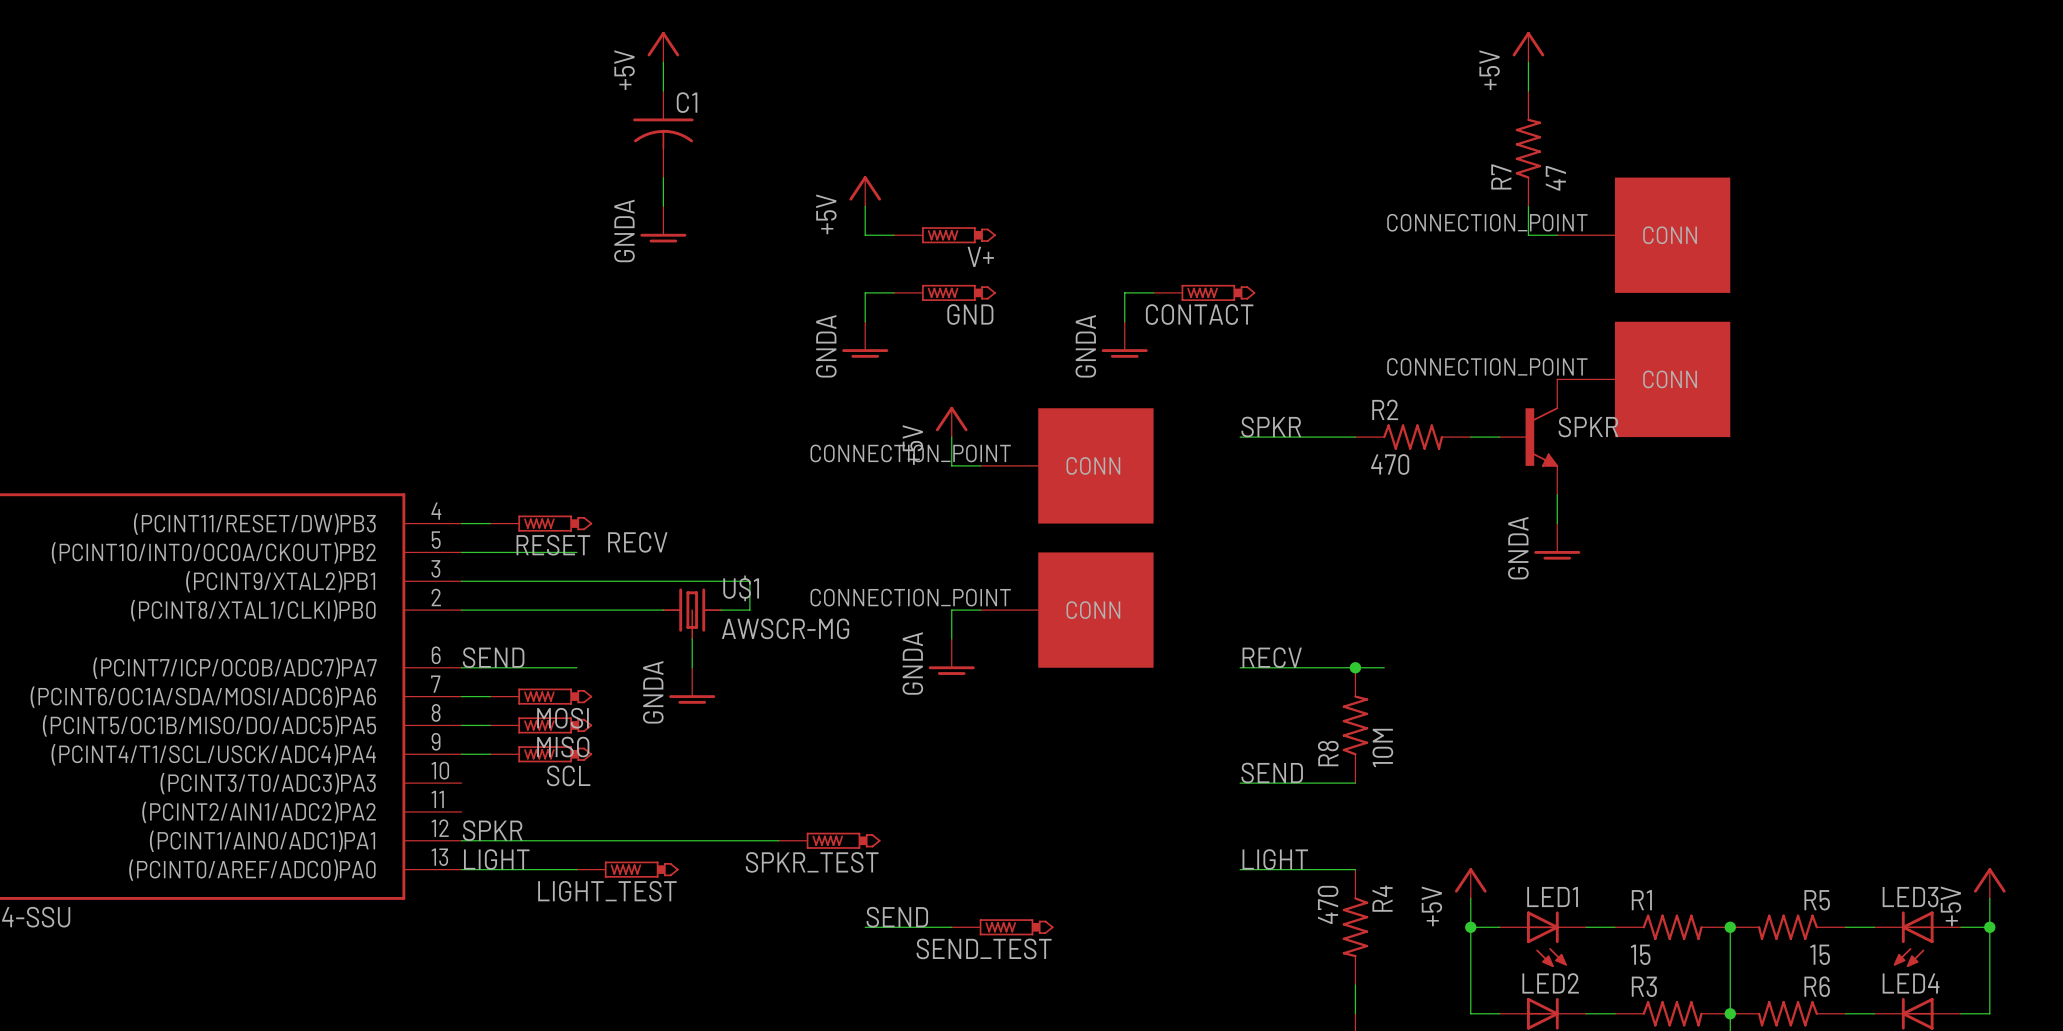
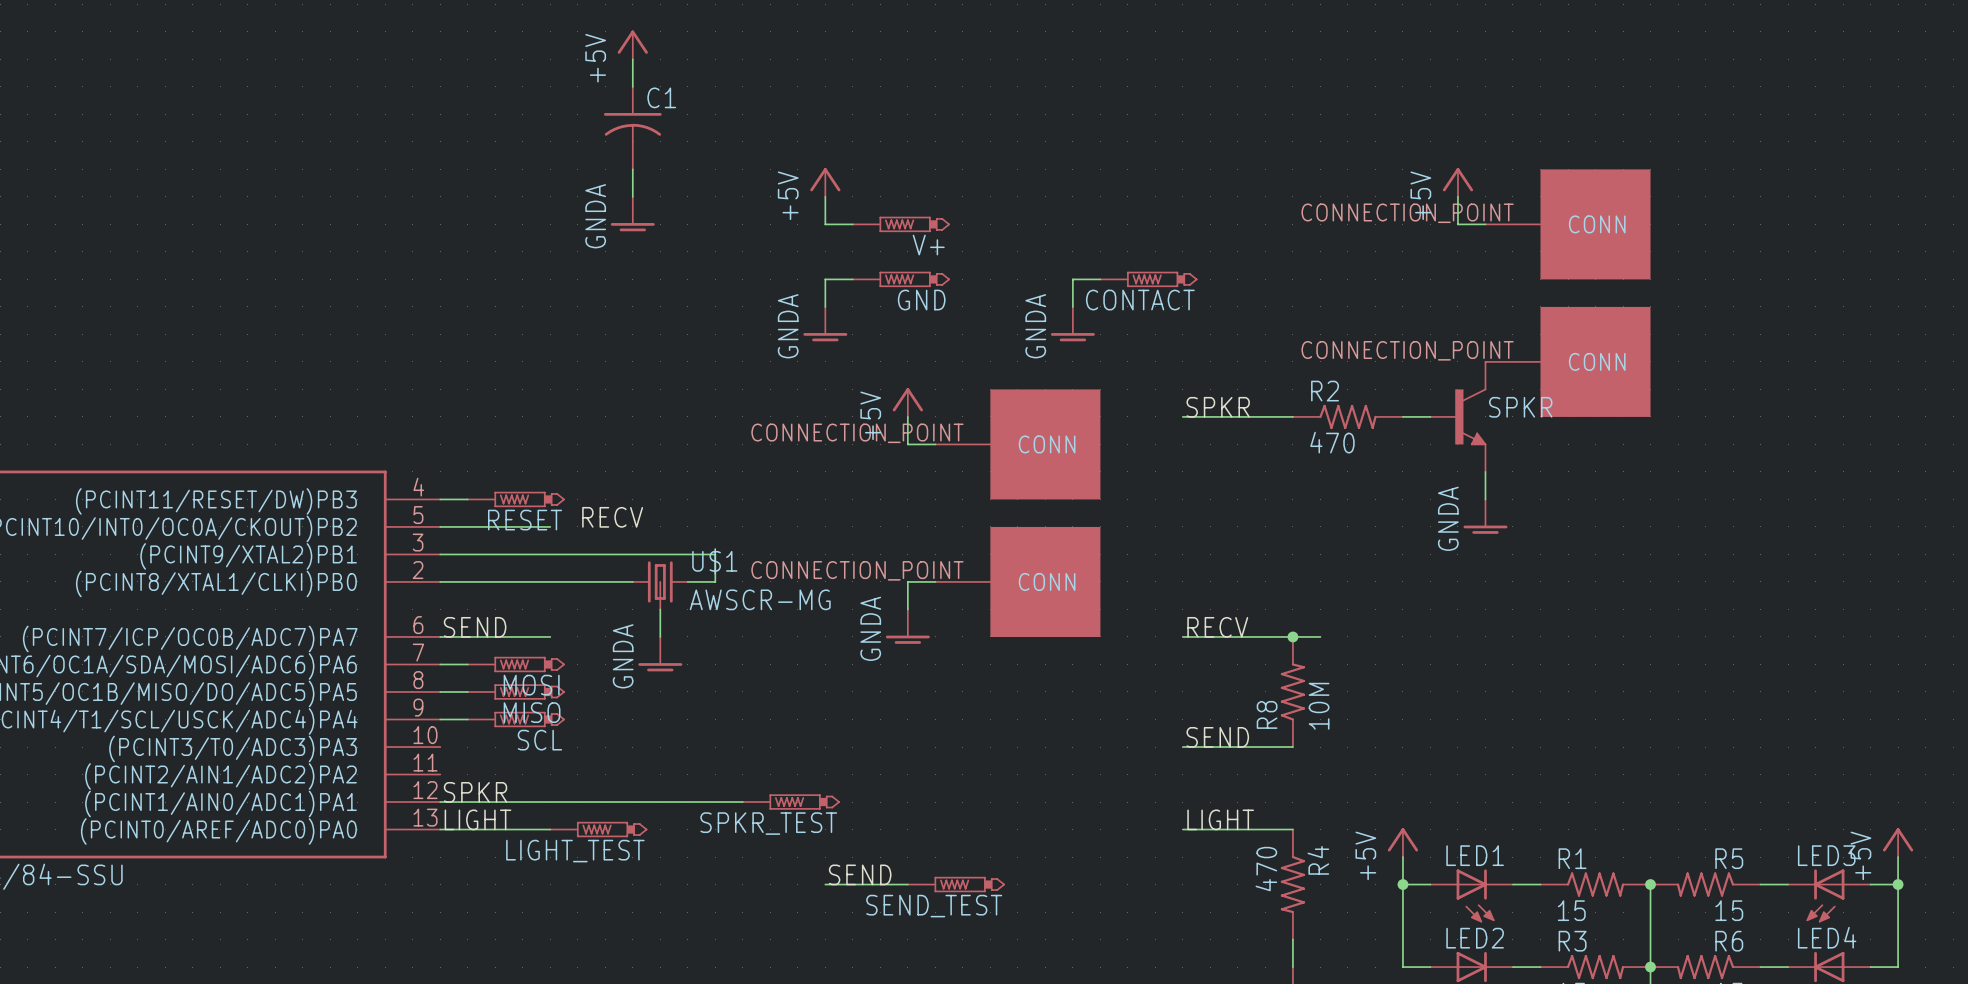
power symbol position: +5V (1528, 47) -> +5V (1457, 182)
wire: (1528, 62) (1528, 91) -> none
R7: 47 (1528, 148) -> none

